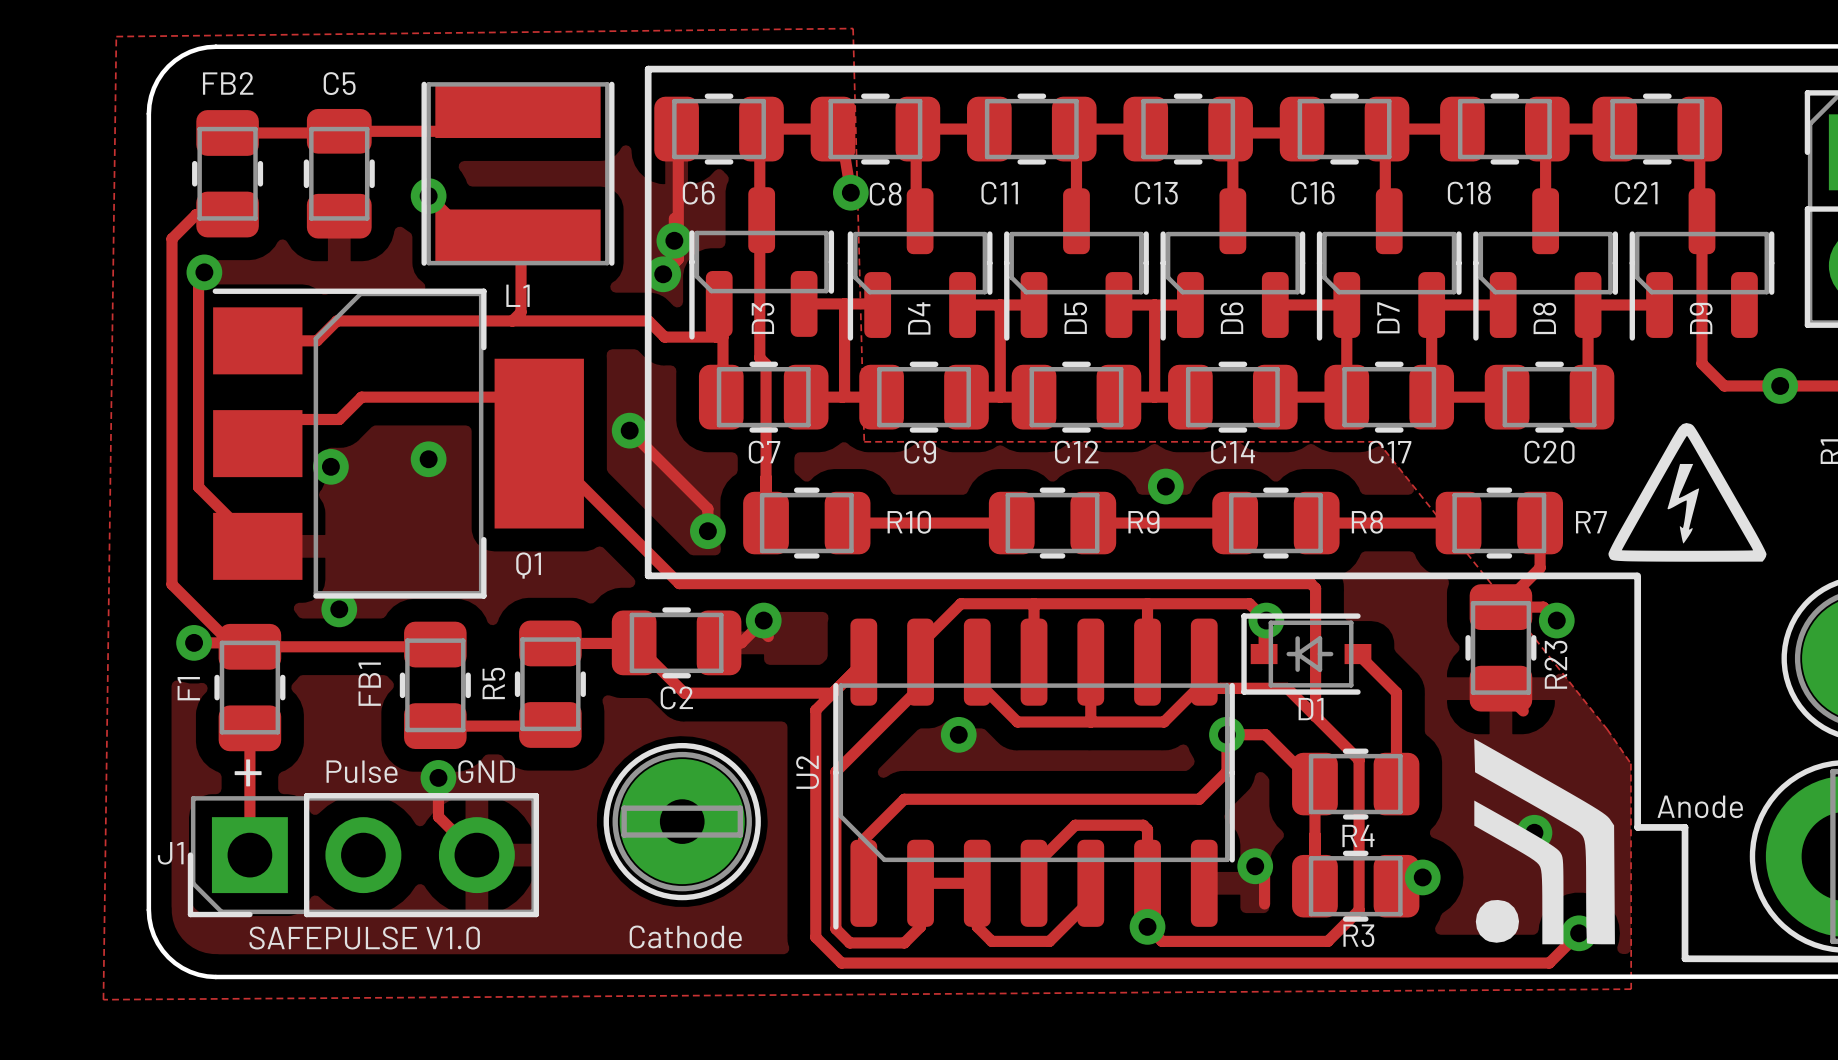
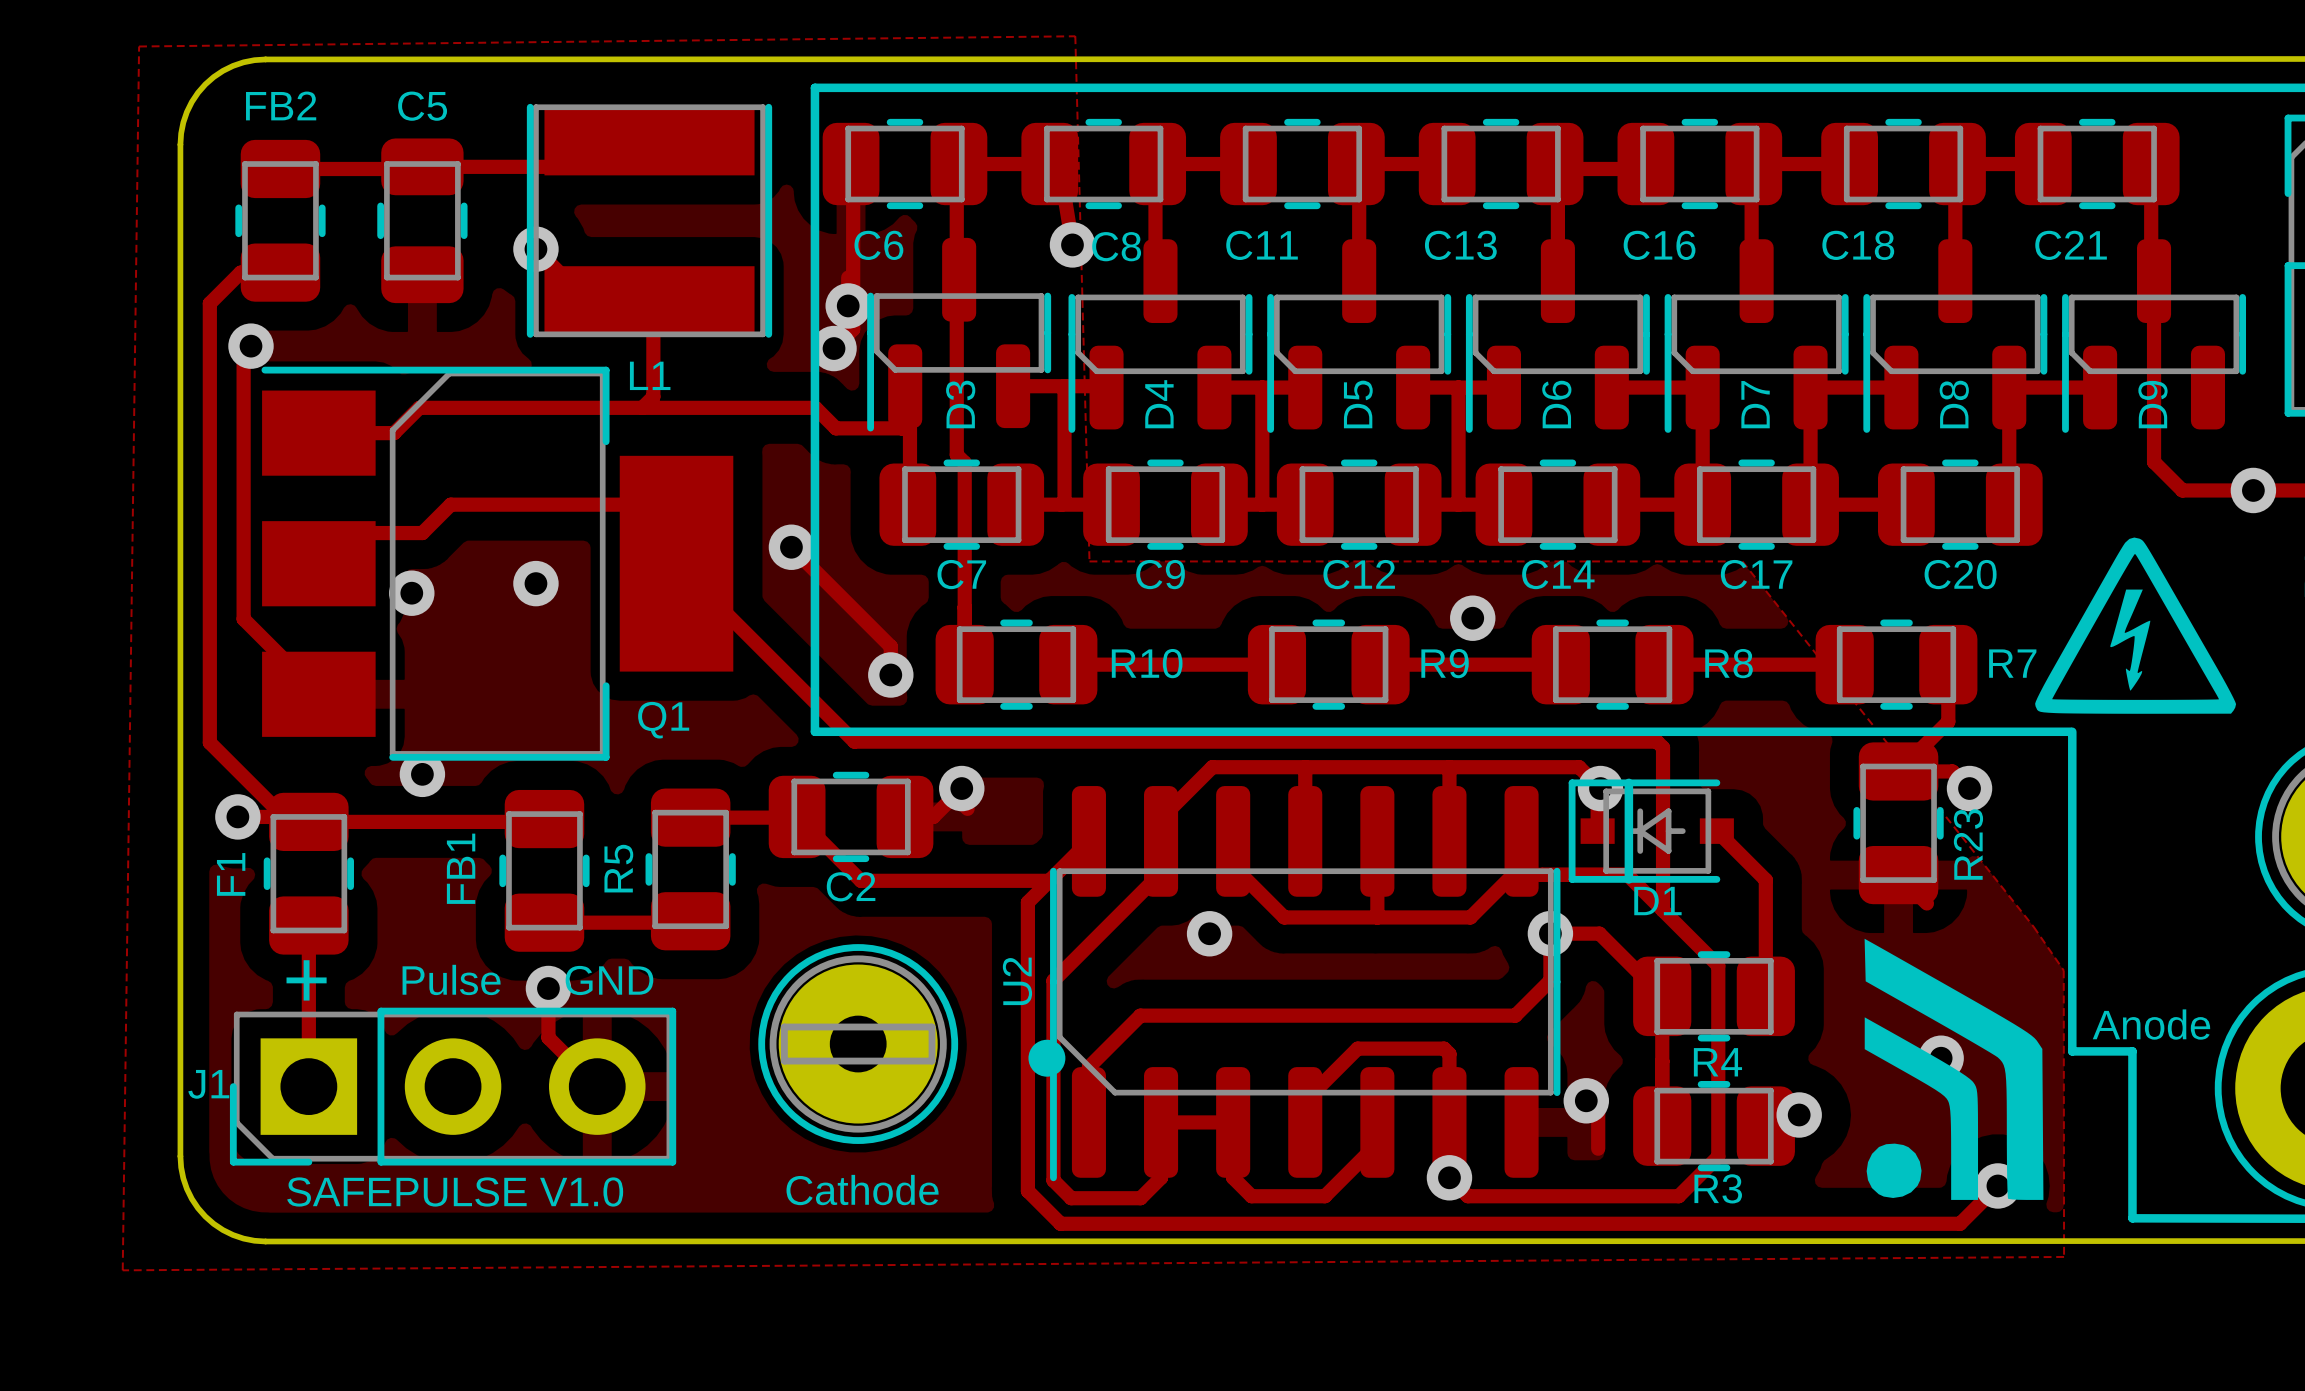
line: none -> (1628, 782) (1628, 879)
drawing: none -> [1028, 1039, 1066, 1077]

